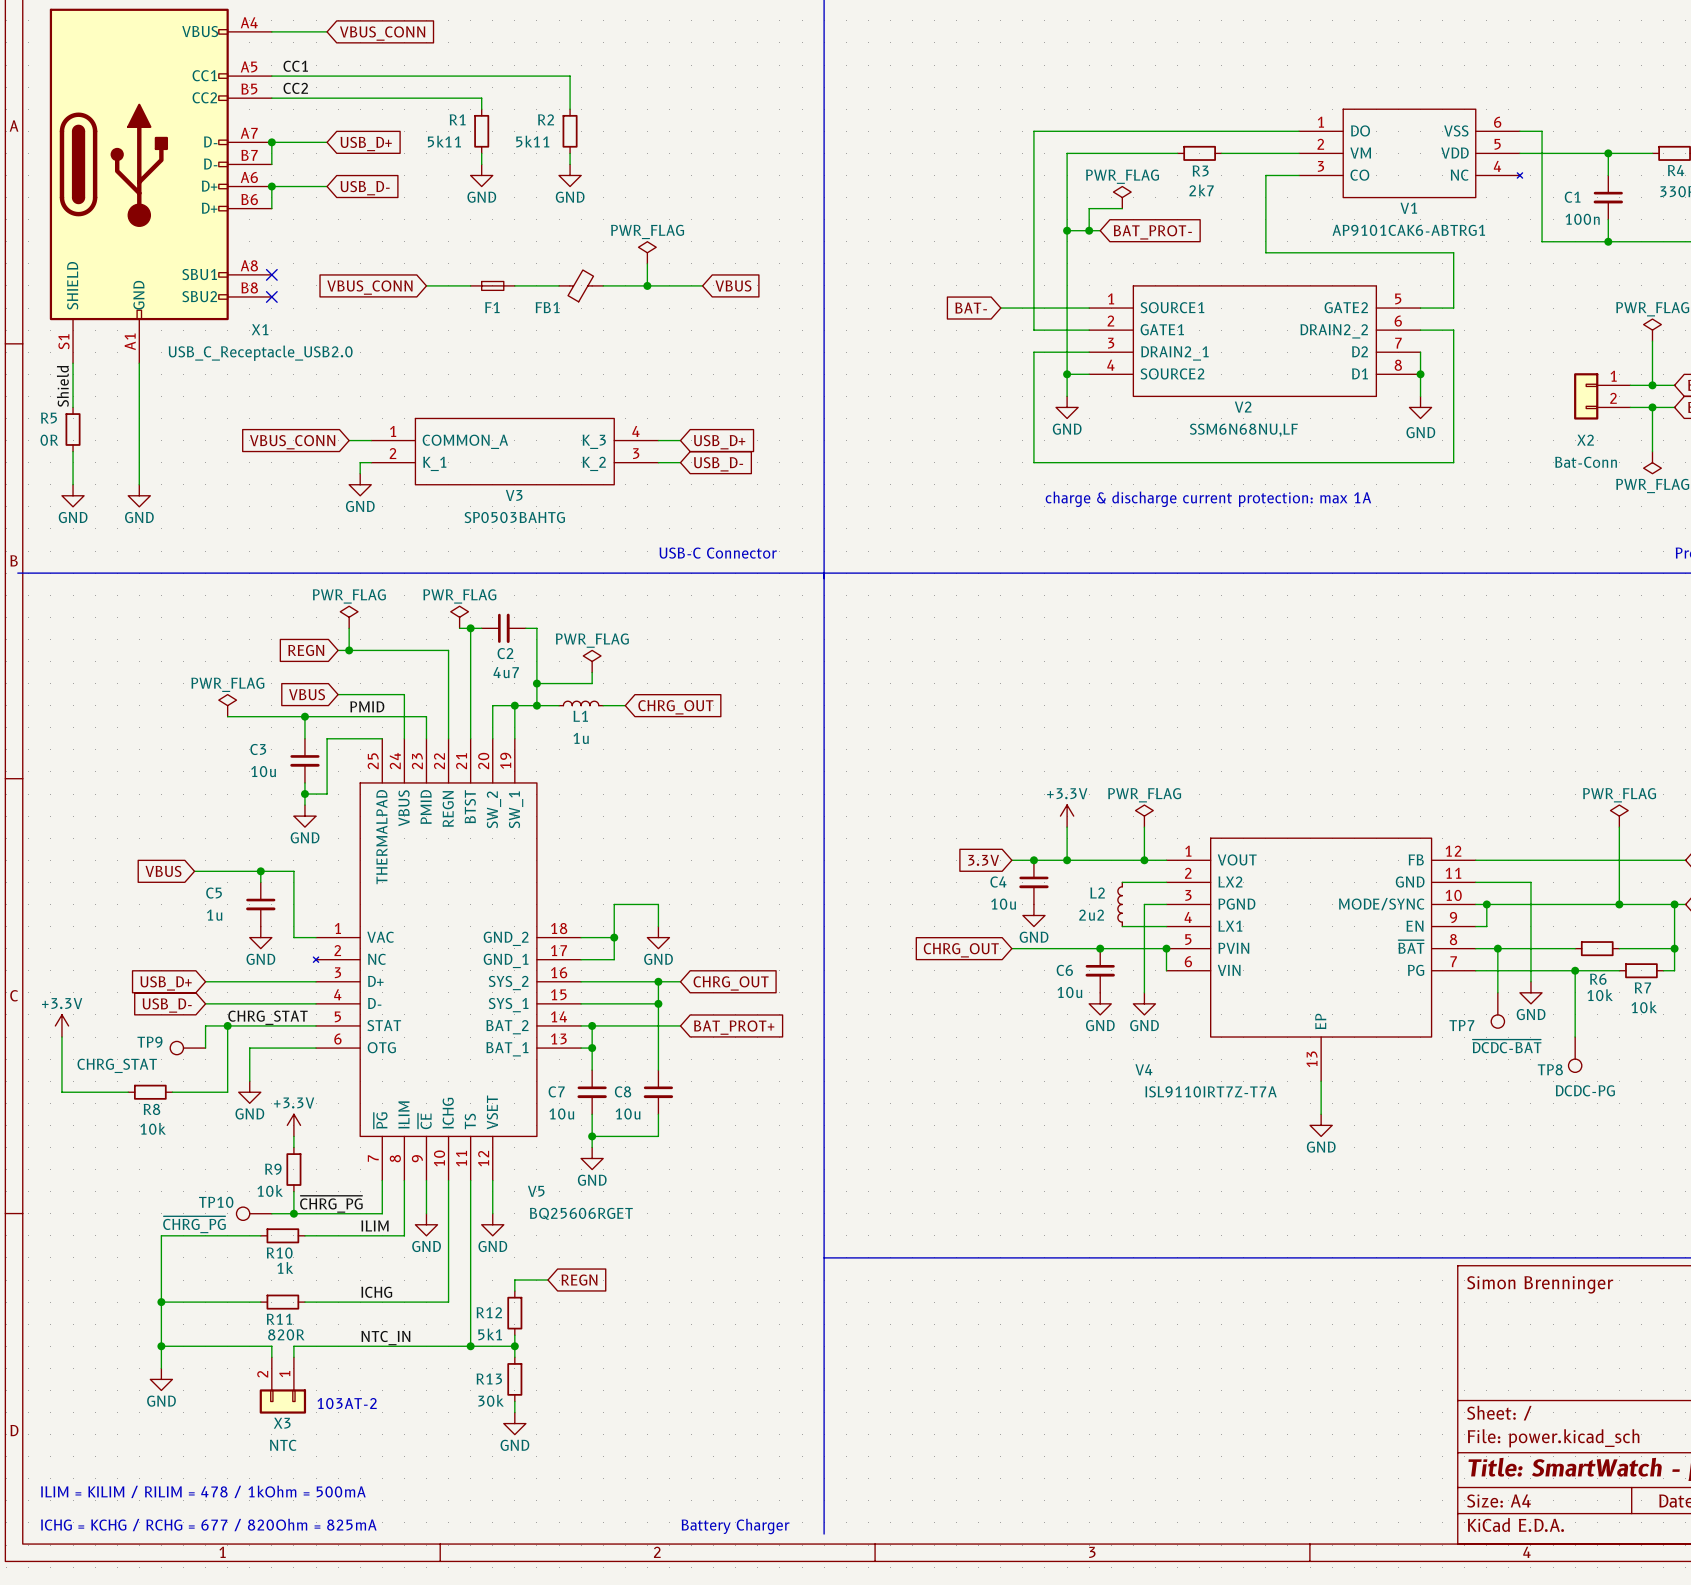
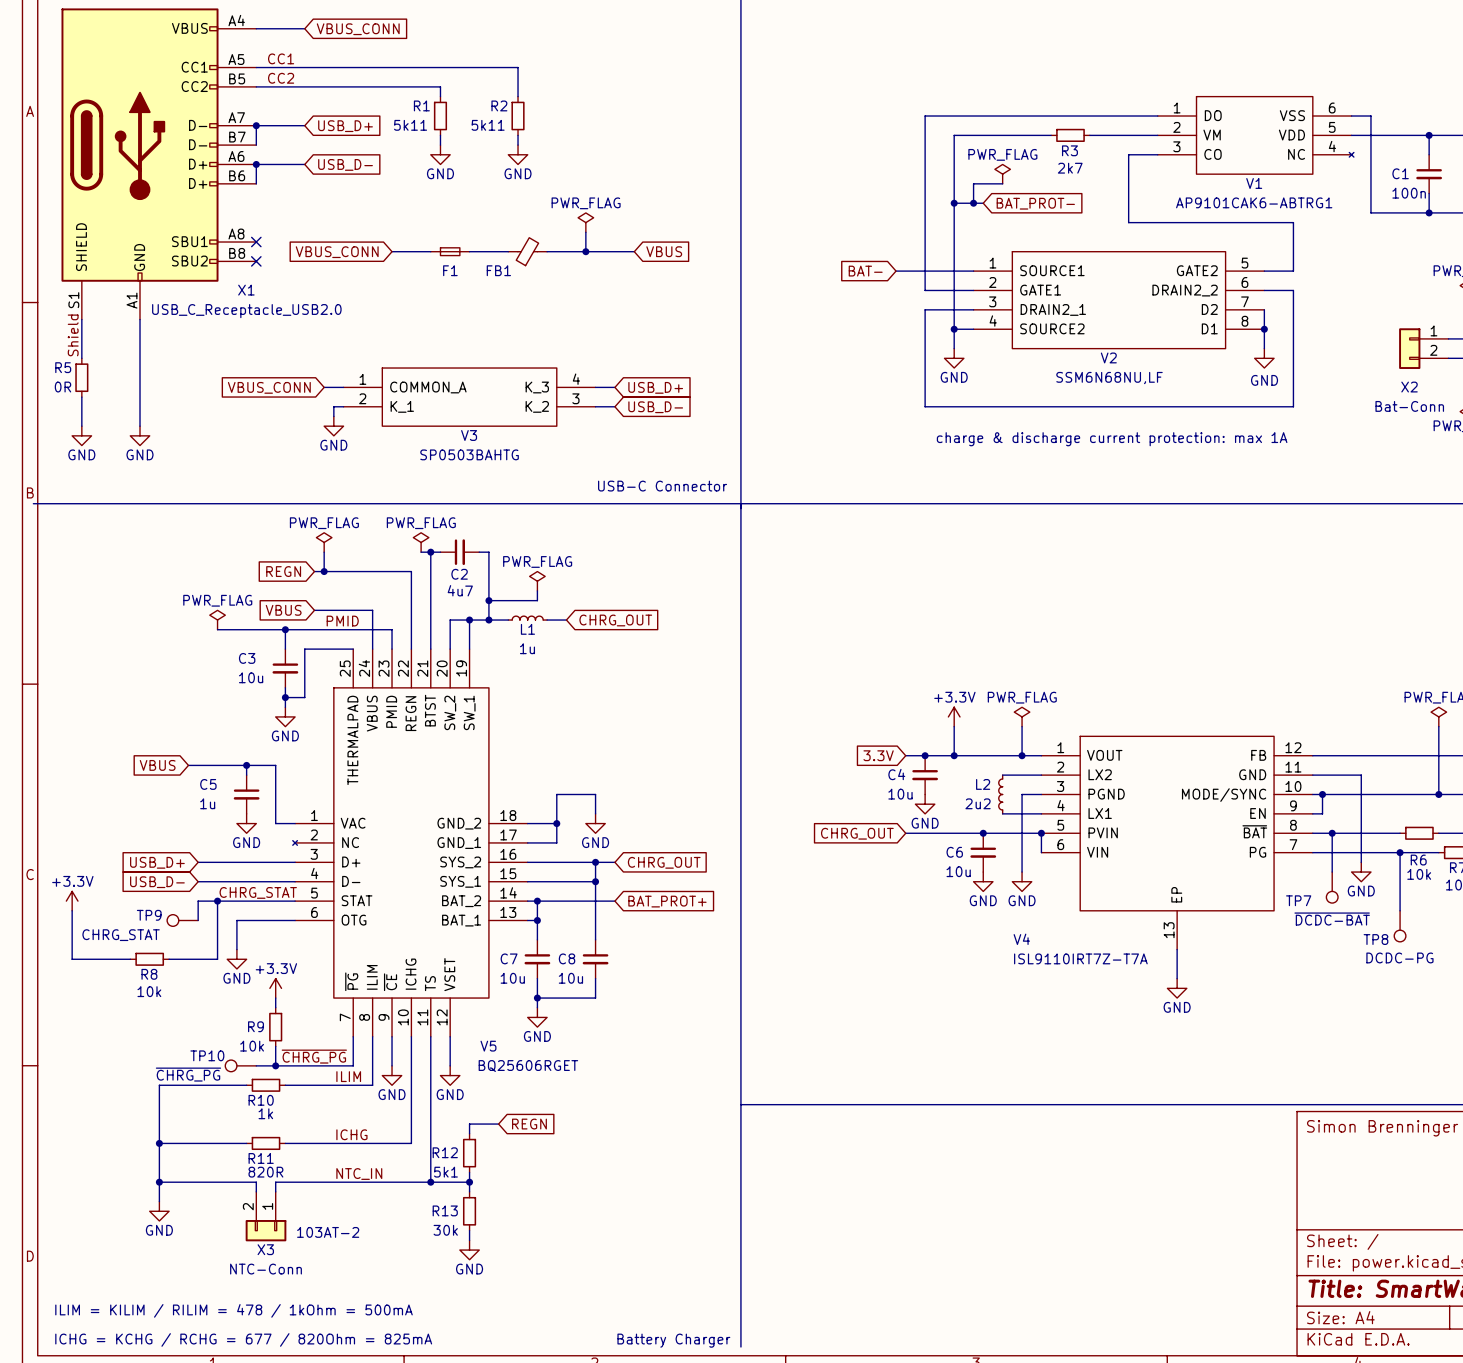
X3 value: NTC (283, 1445) -> NTC-Conn (266, 1269)

